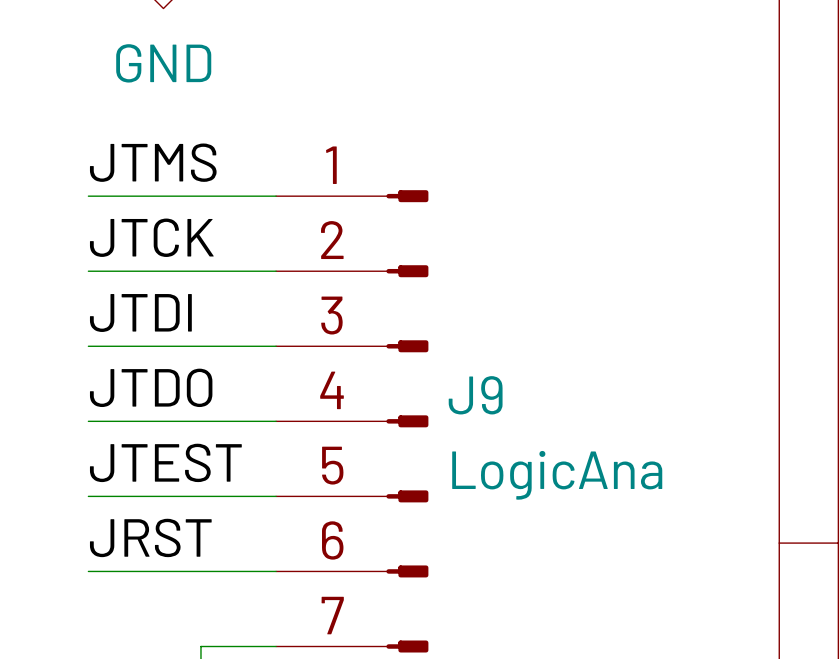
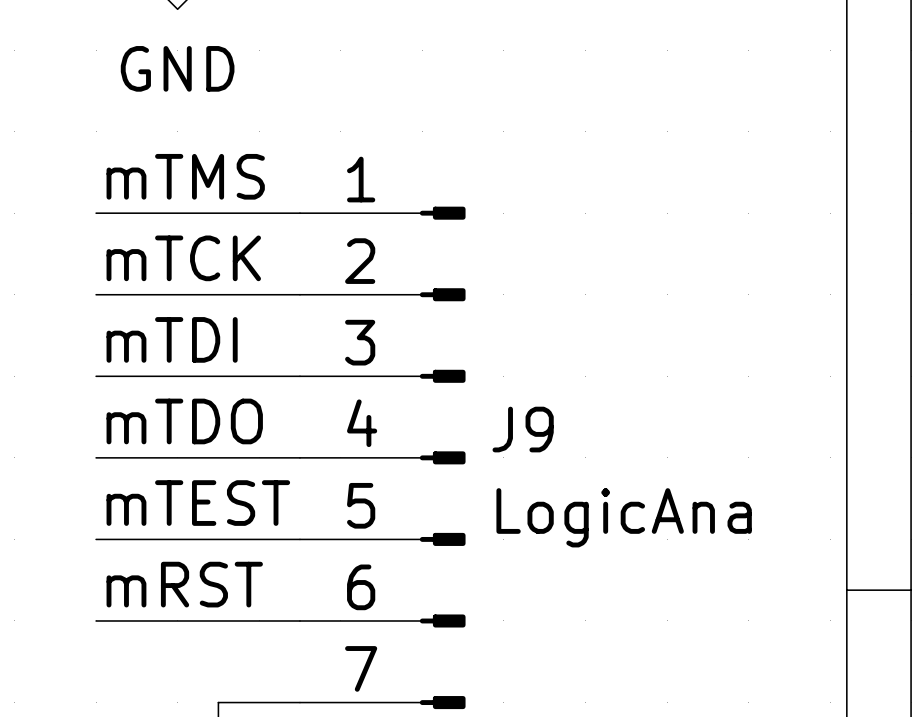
label: JTMS (153, 162) -> mTMS (185, 176)
label: JTCK (151, 237) -> mTCK (183, 258)
label: JTDI (140, 313) -> mTDI (172, 339)
label: JTDO (151, 387) -> mTDO (184, 421)
label: JTEST (165, 462) -> mTEST (198, 503)
label: JRST (150, 537) -> mRST (184, 584)

